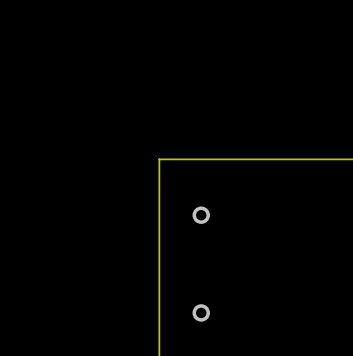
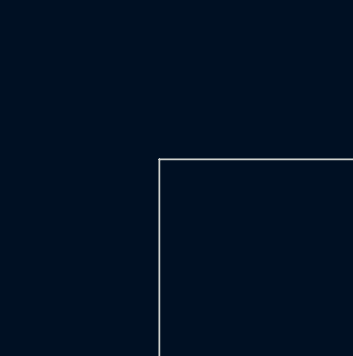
via: (201, 215) -> none
via: (201, 312) -> none

